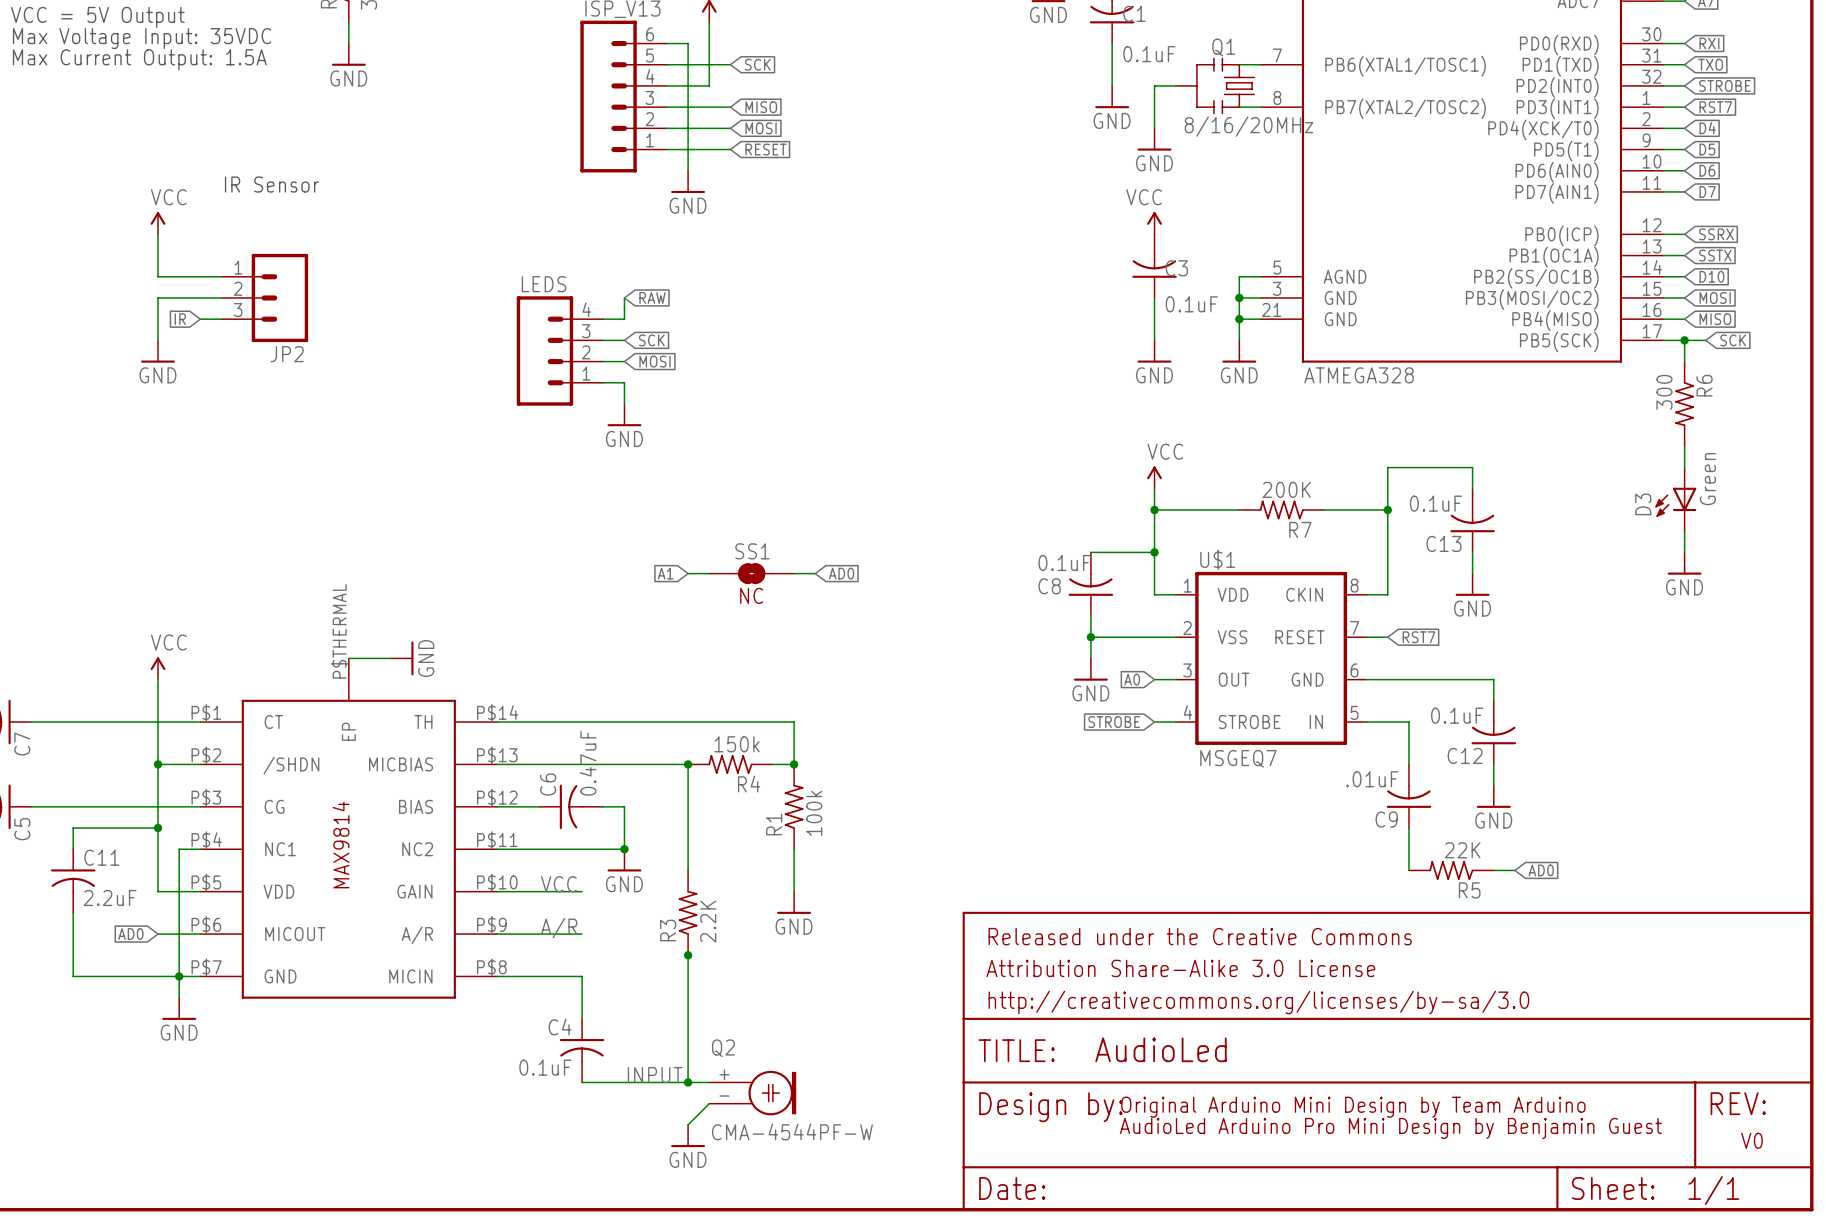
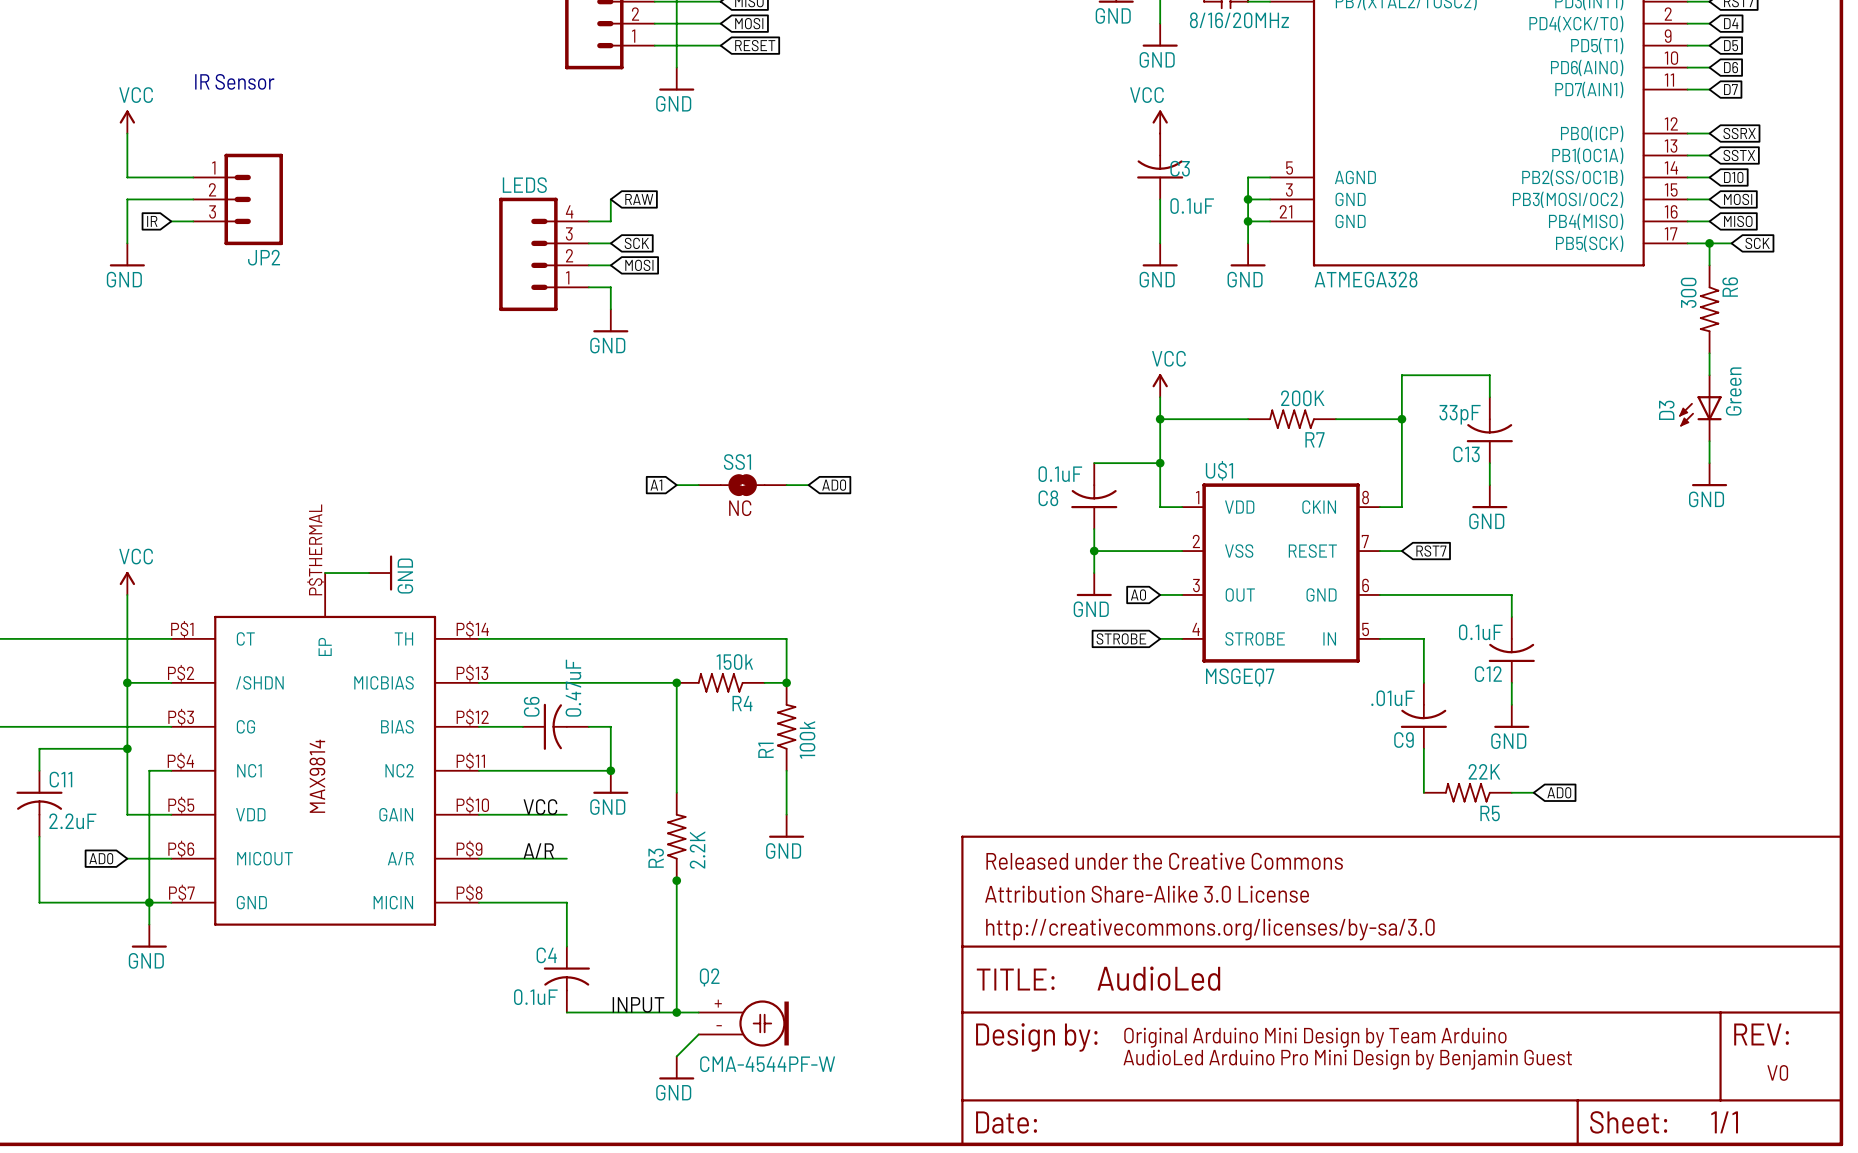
C13 value: 0.1uF (1435, 503) -> 33pF (1460, 414)

